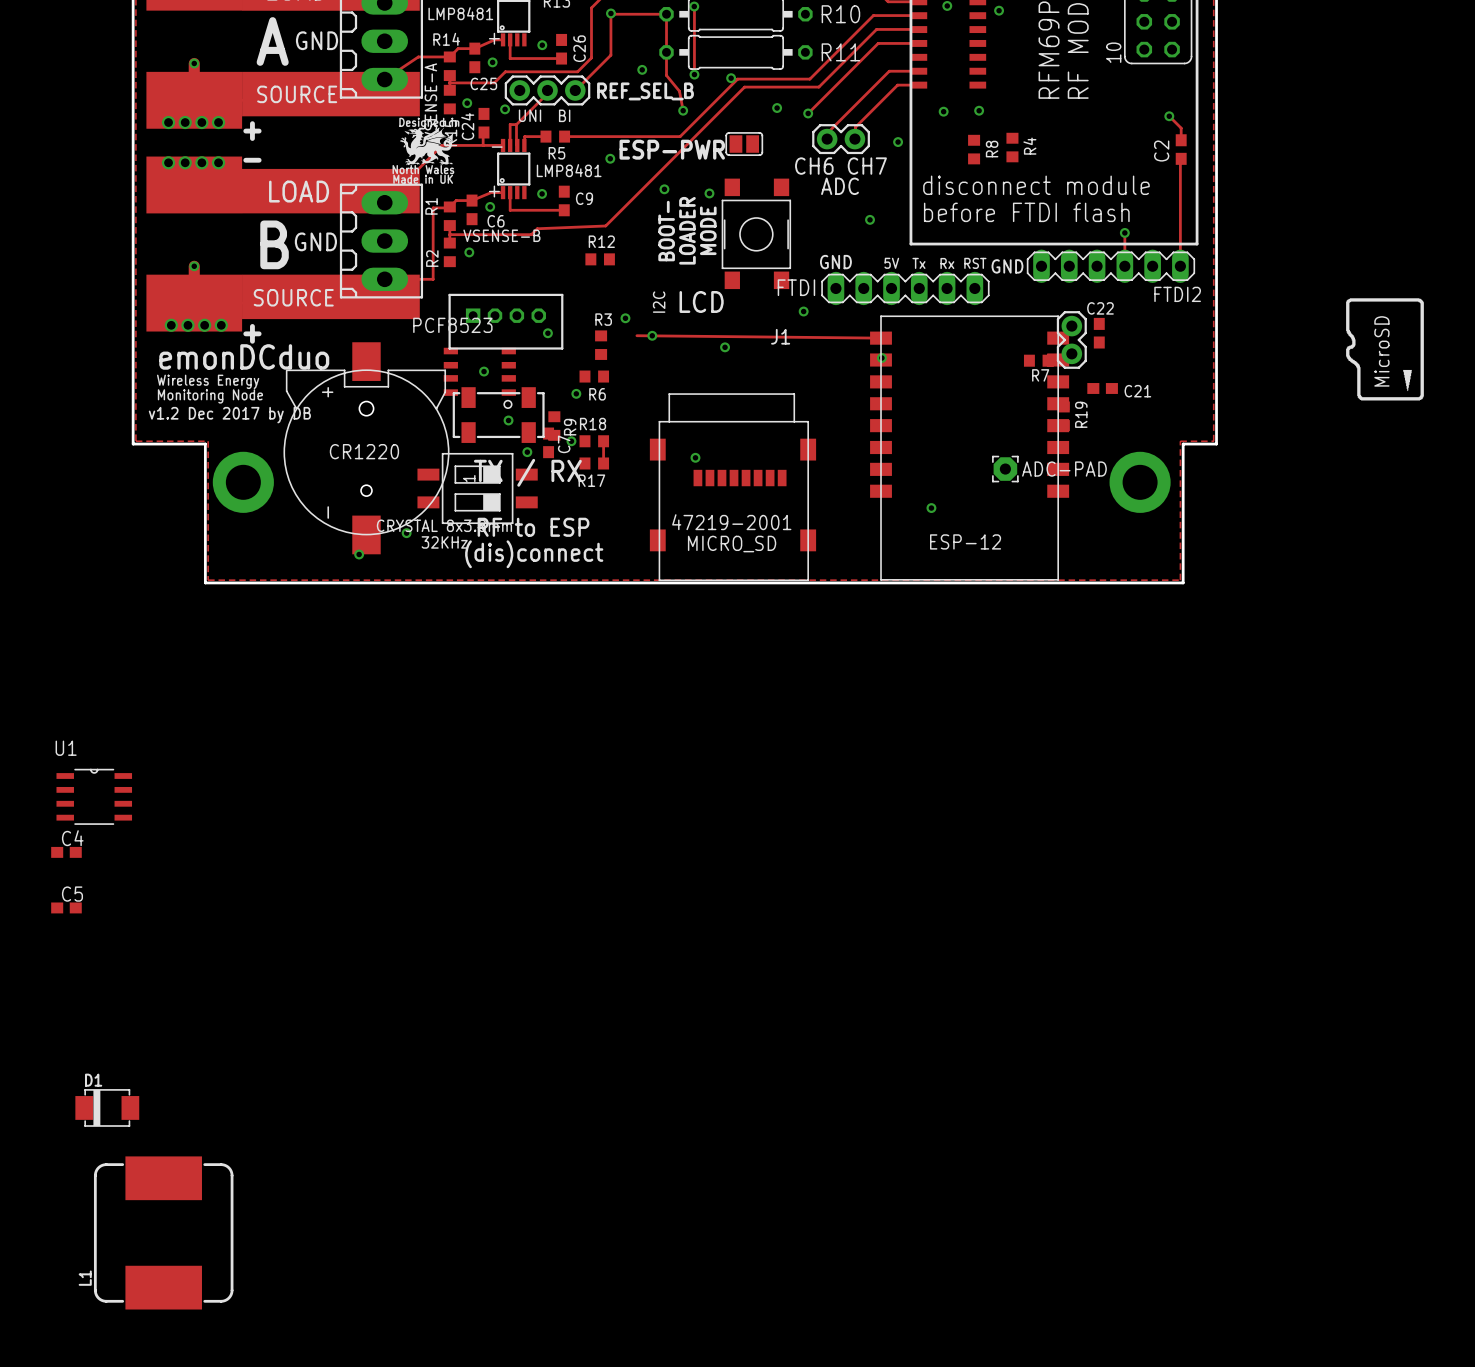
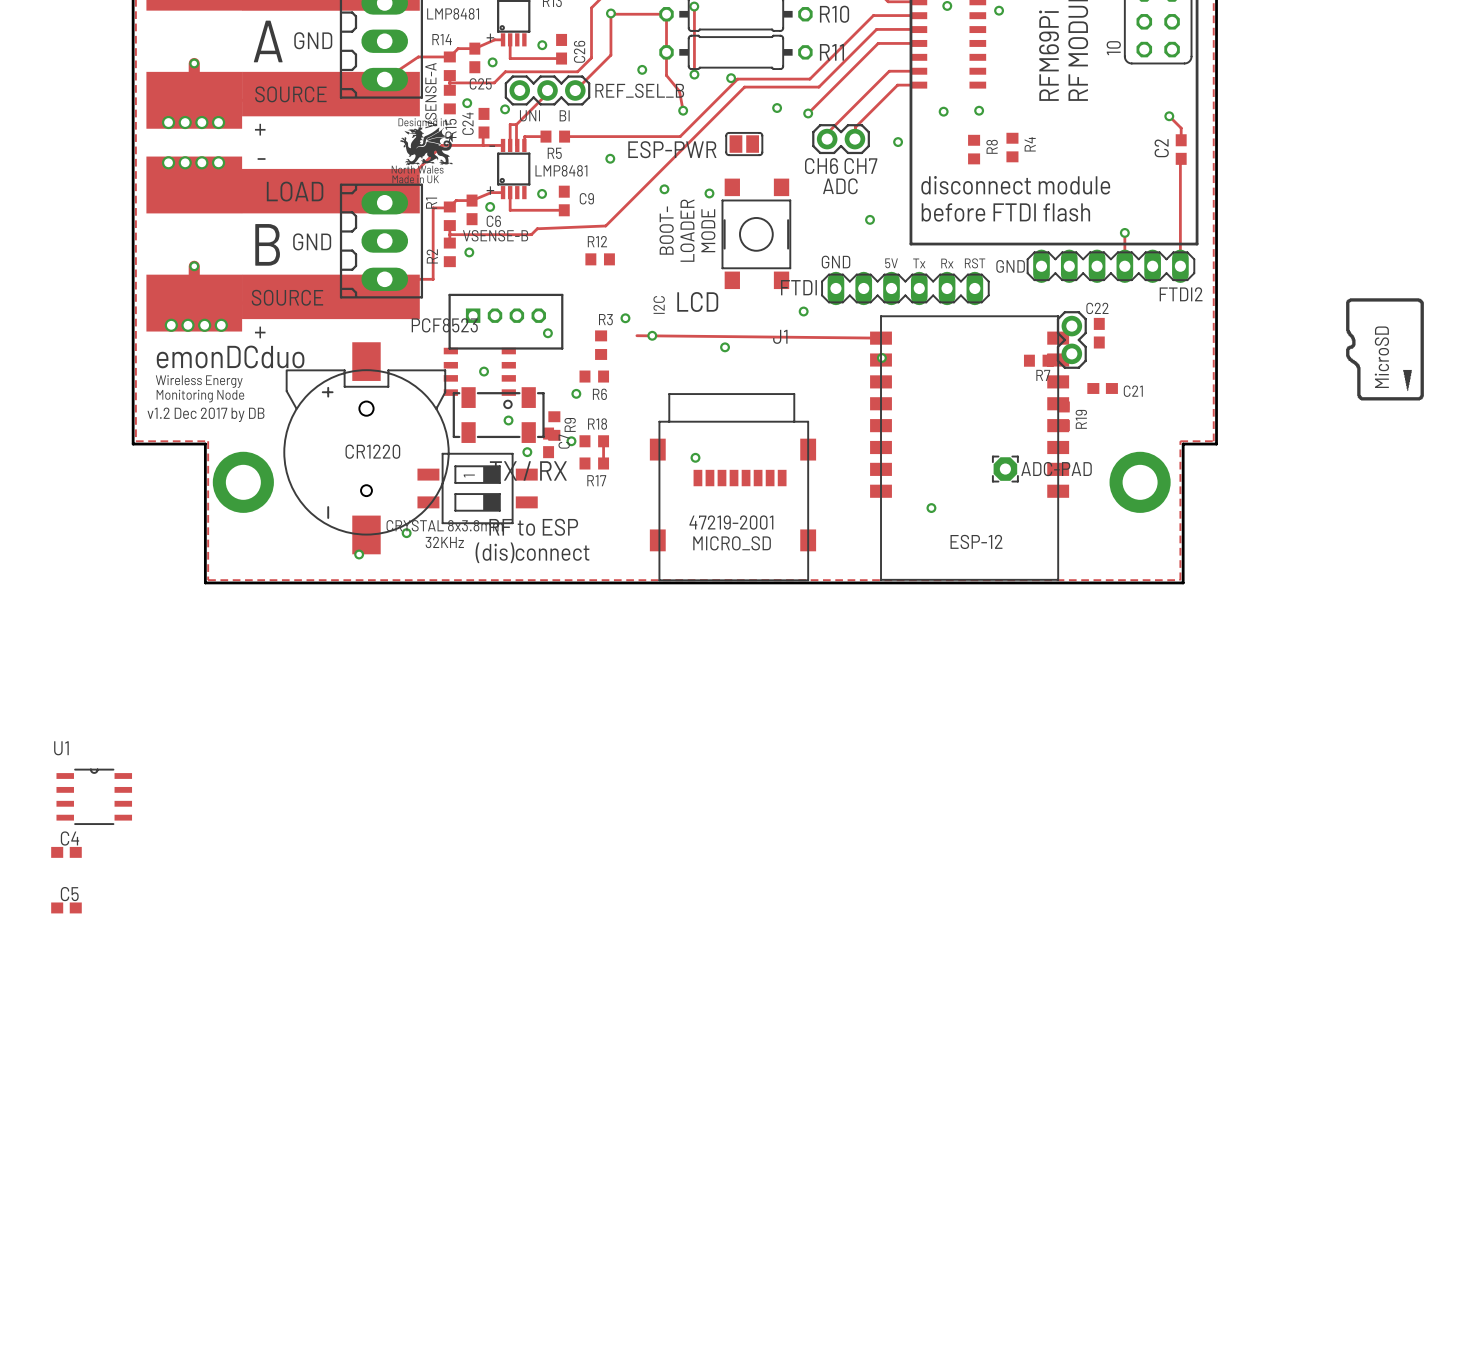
D1: (107, 1107) -> none
L1: (163, 1232) -> none

